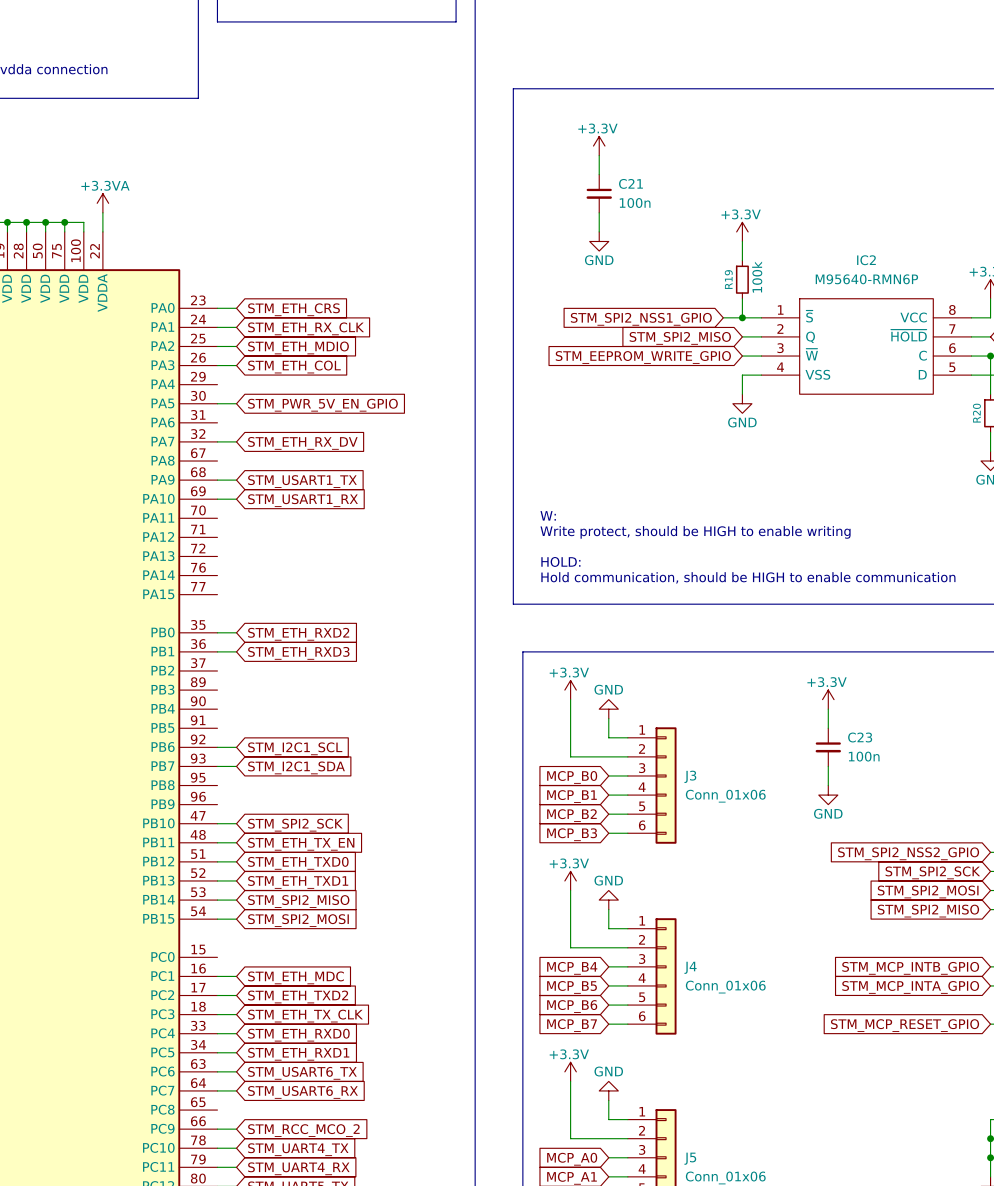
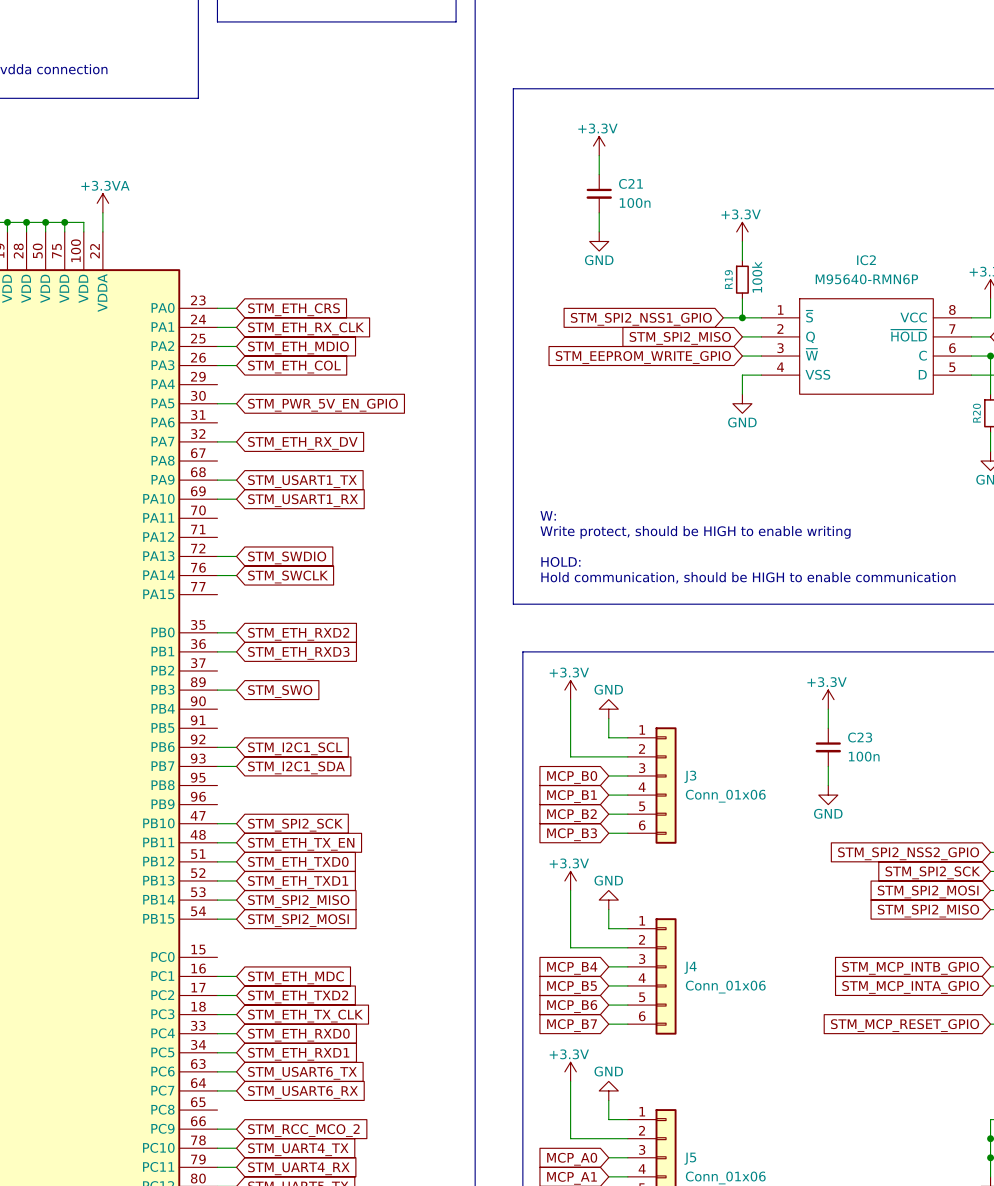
wire: none -> (217, 556) (236, 556)
global label: none -> STM_SWDIO (287, 557)
wire: none -> (217, 575) (236, 575)
global label: none -> STM_SWCLK (288, 577)
wire: none -> (217, 690) (236, 690)
global label: none -> STM_SWO (280, 691)

